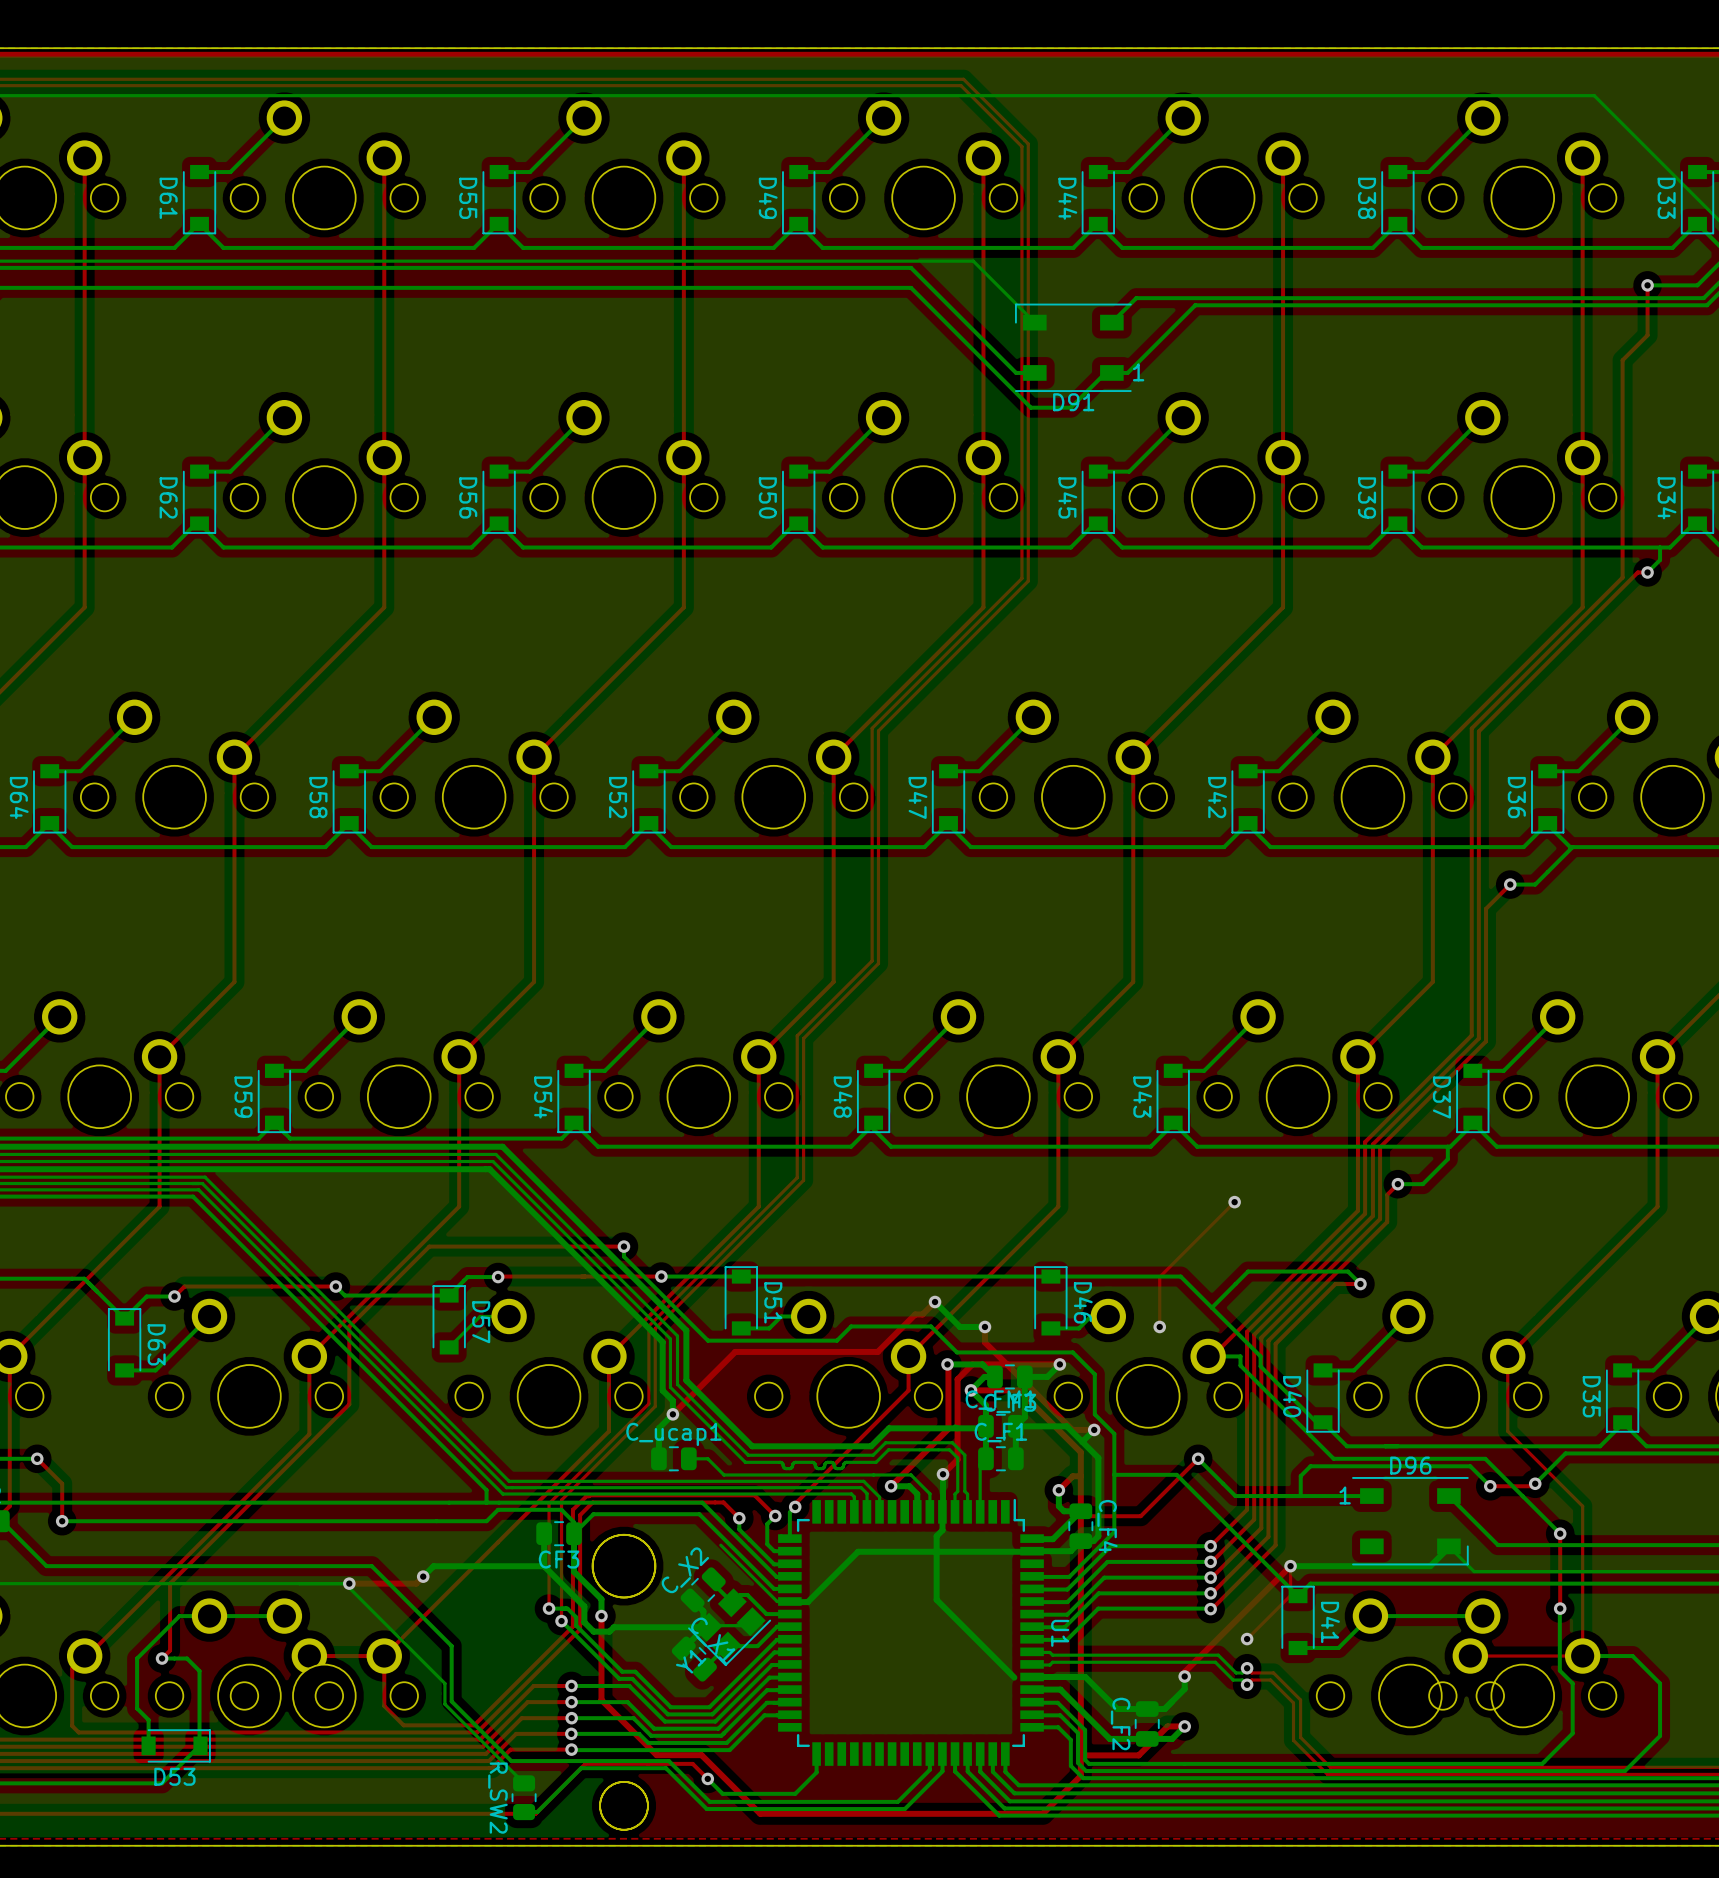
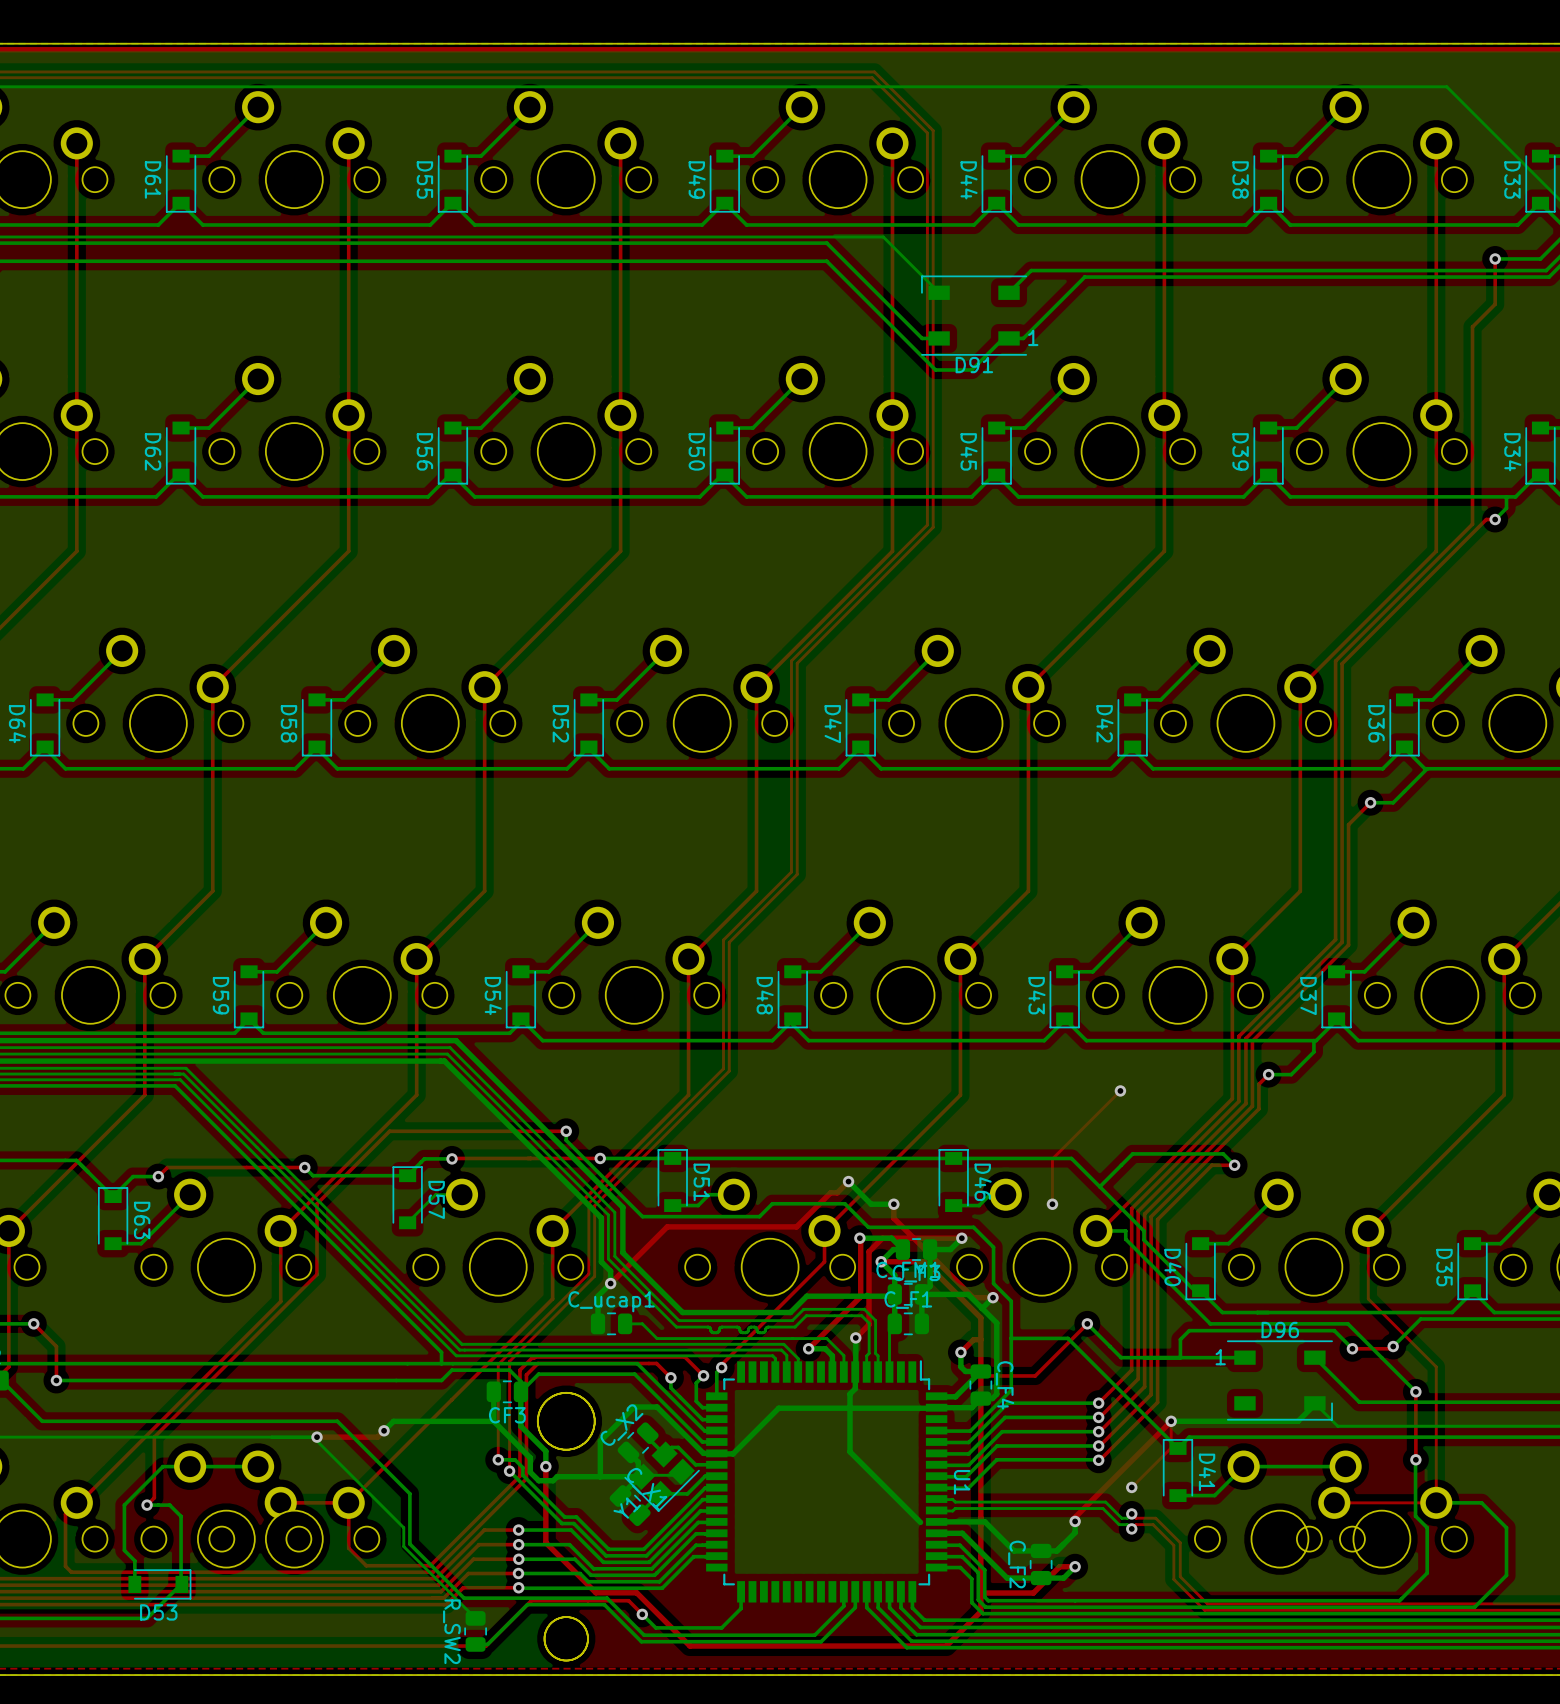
bottom track: (720, 1545) (777, 1601) -> (600, 1476) (600, 1441) (634, 1407) (657, 1407) (705, 1453)

